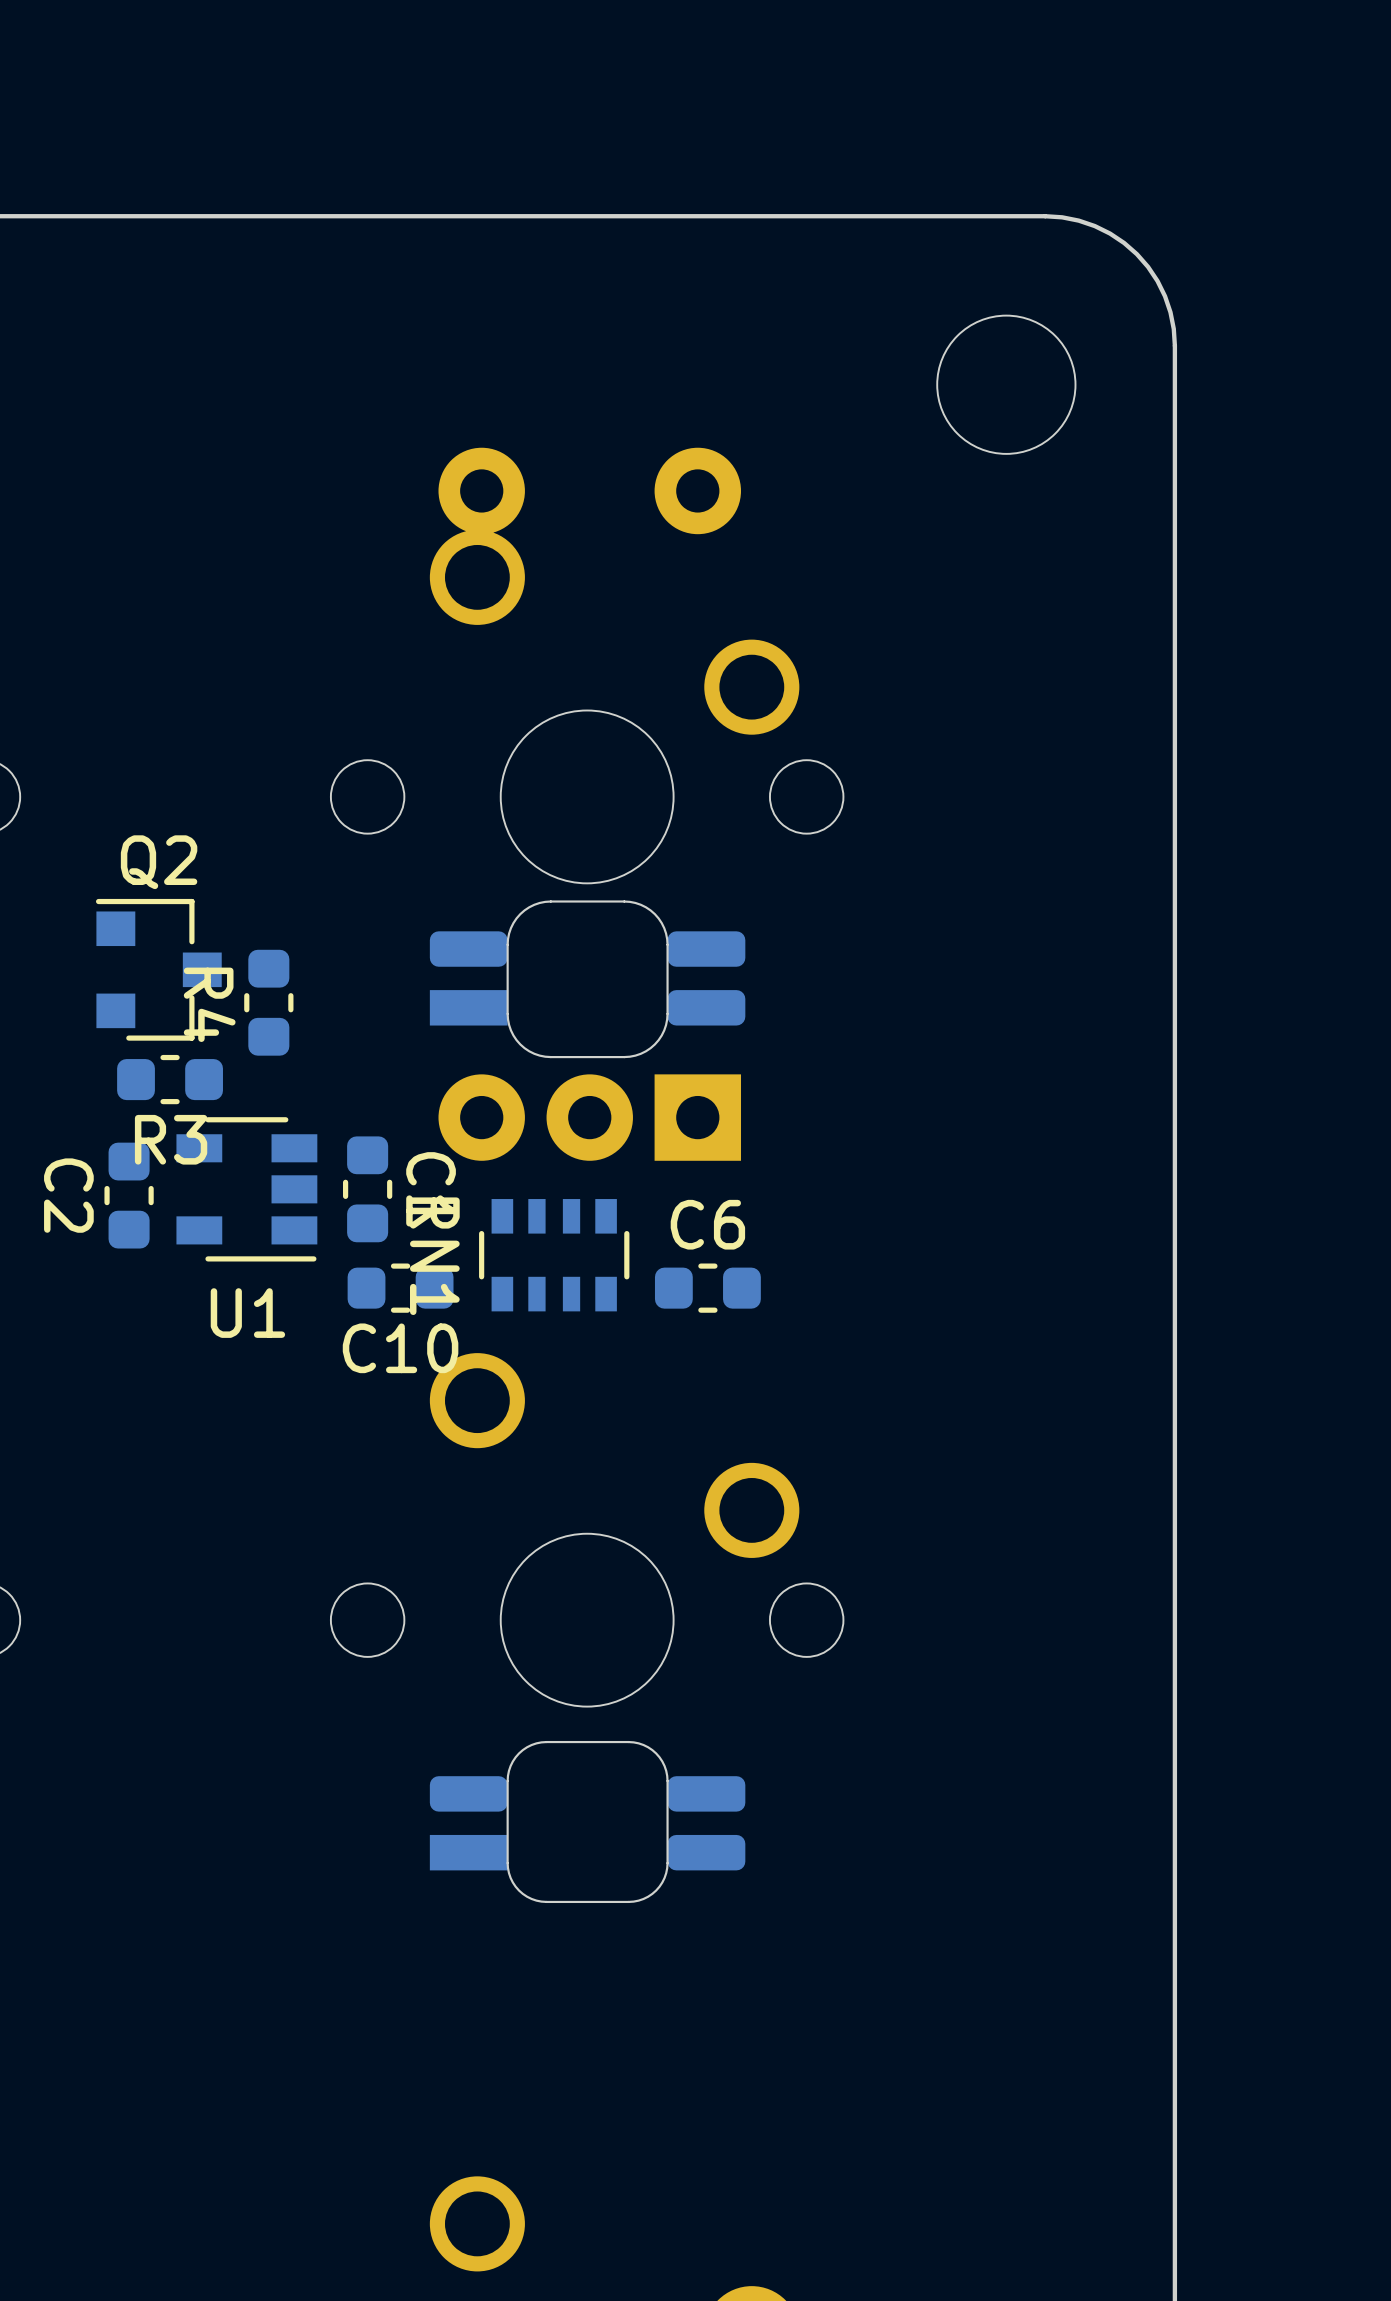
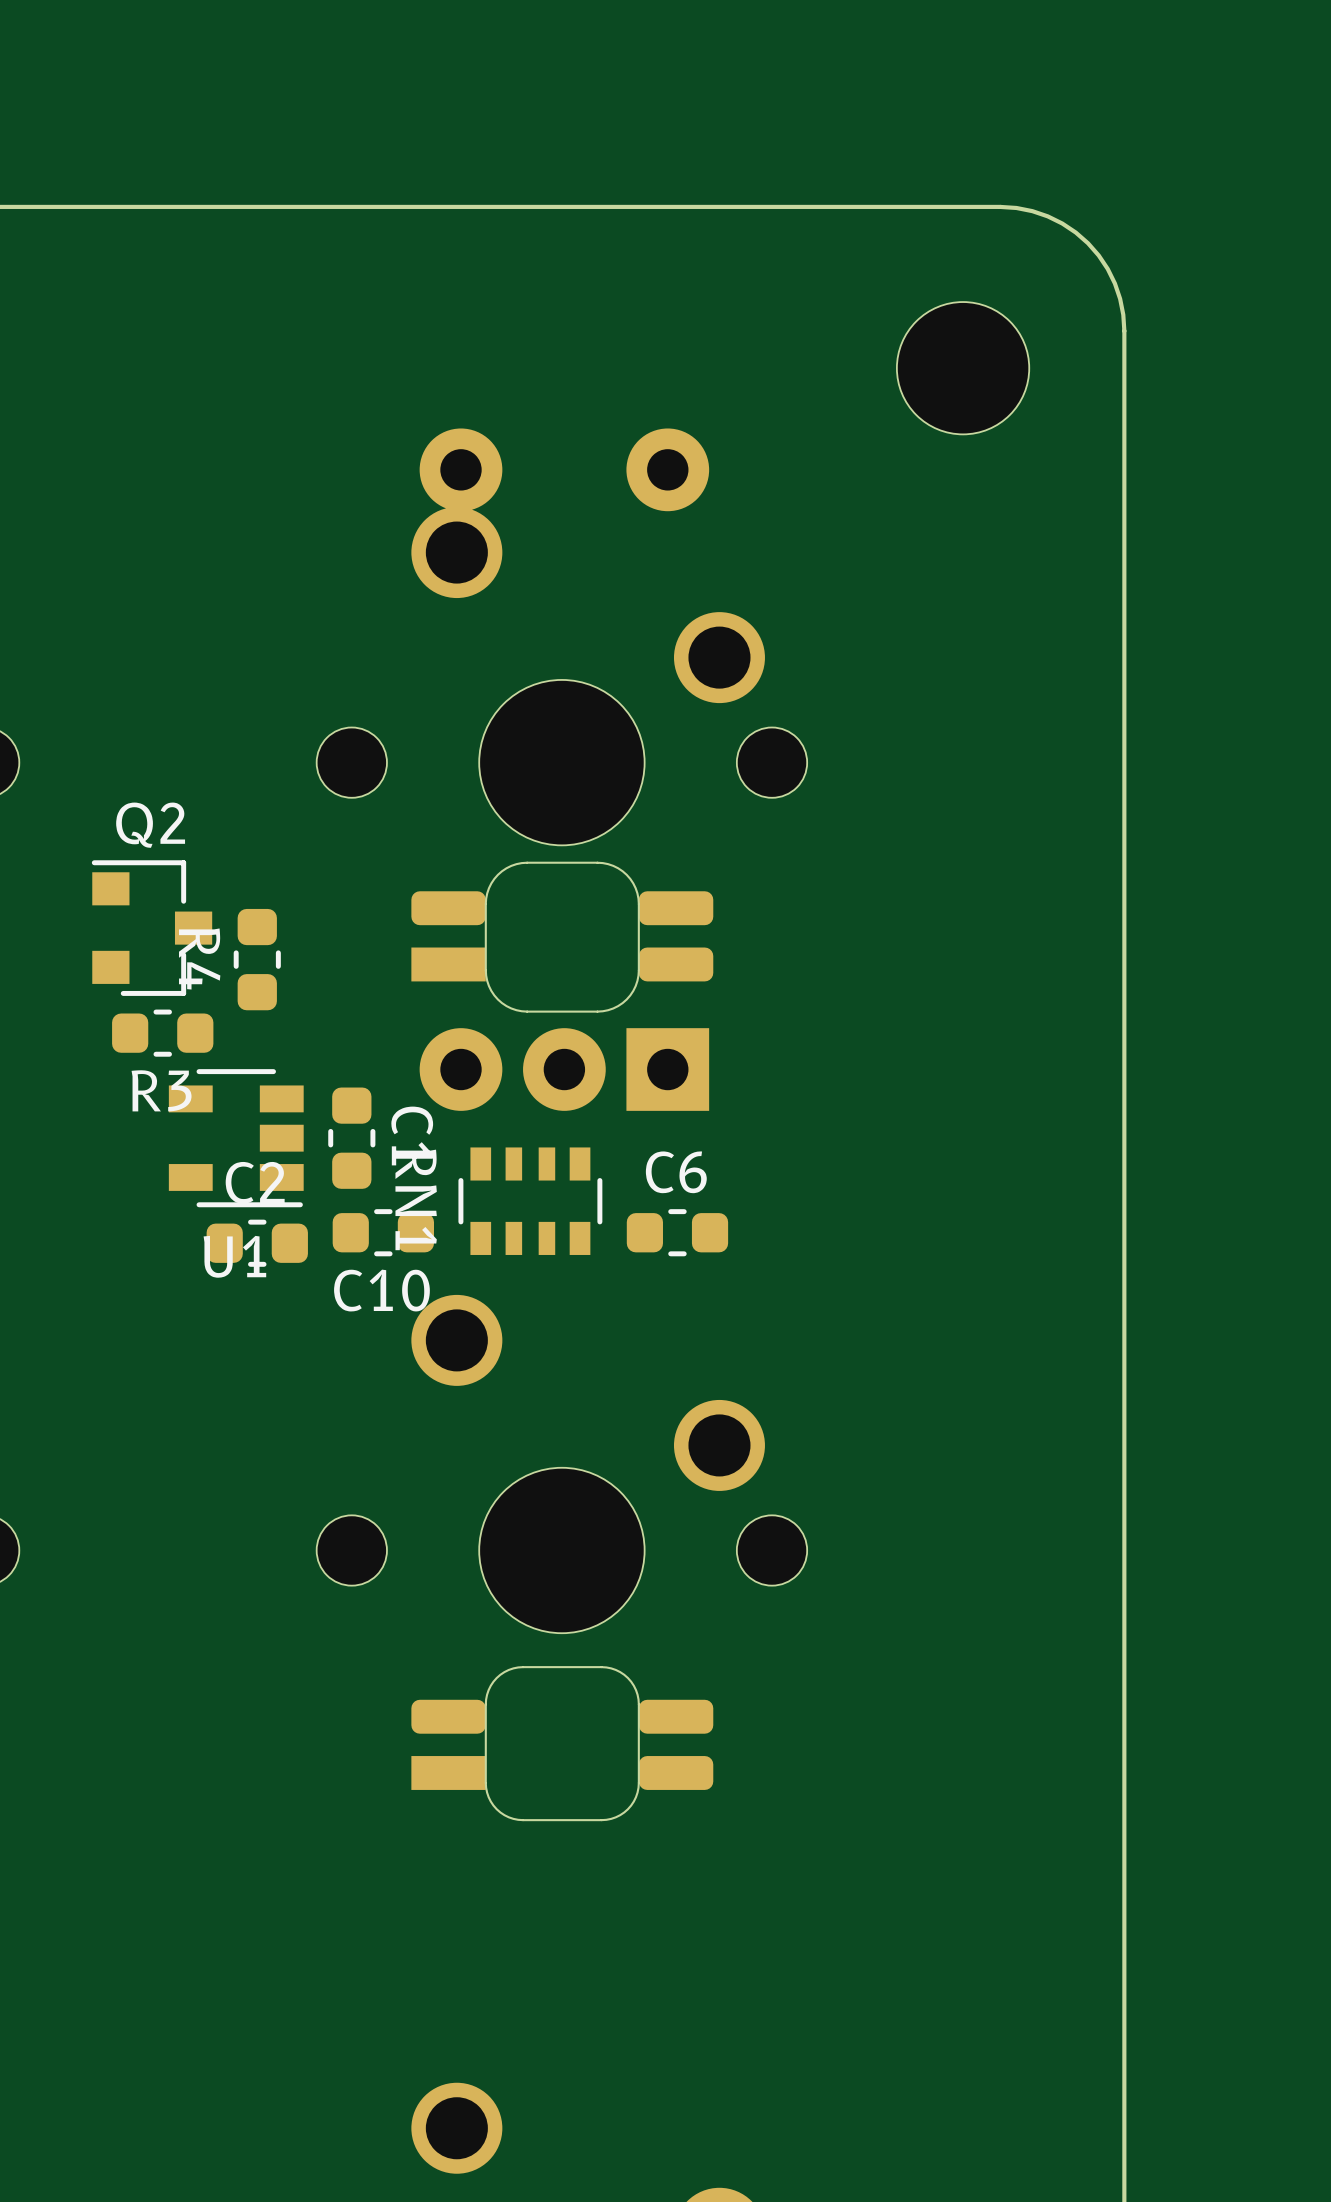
C2 rotation: 0° (129, 1195) -> 90° clockwise (257, 1243)
C2 position: (129, 1195) -> (257, 1243)

